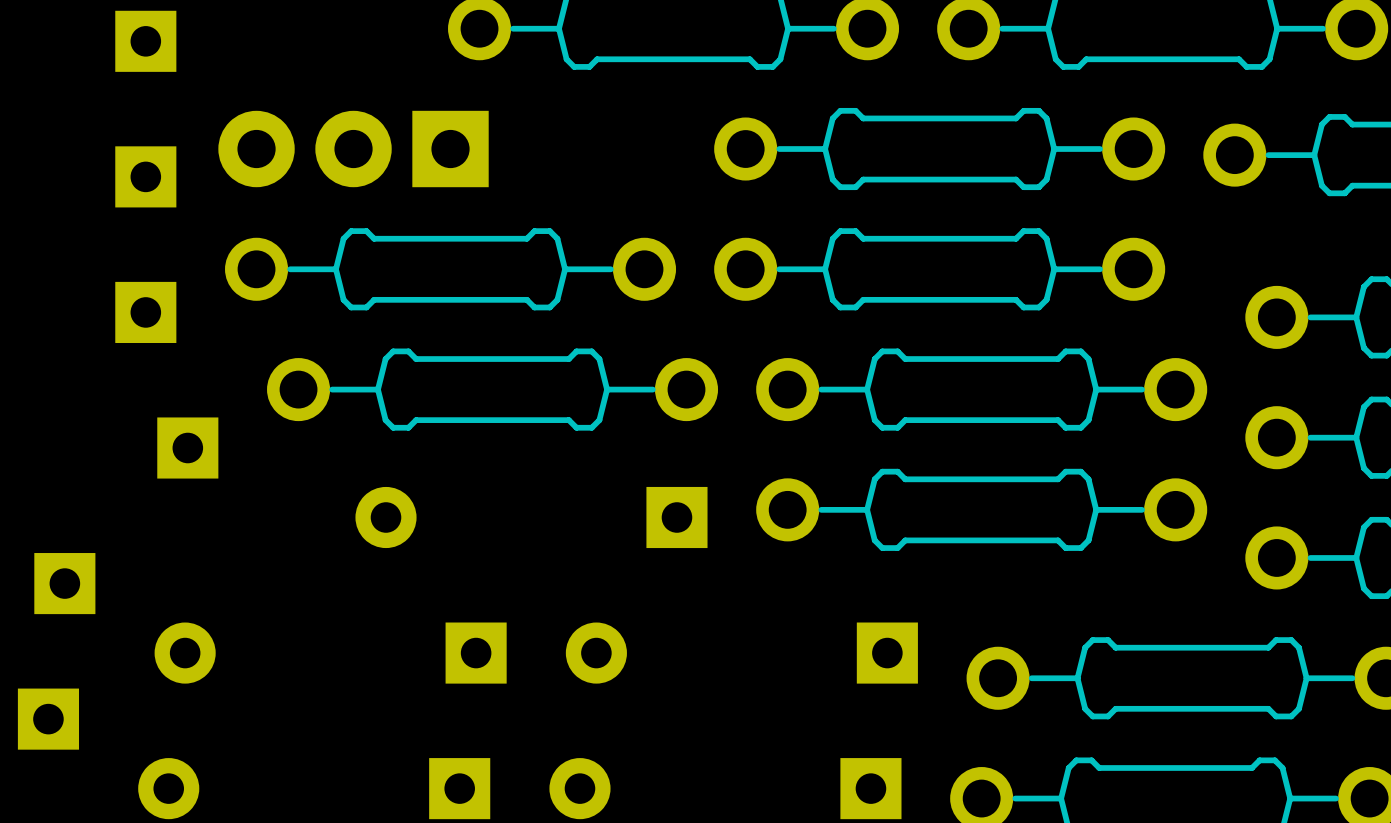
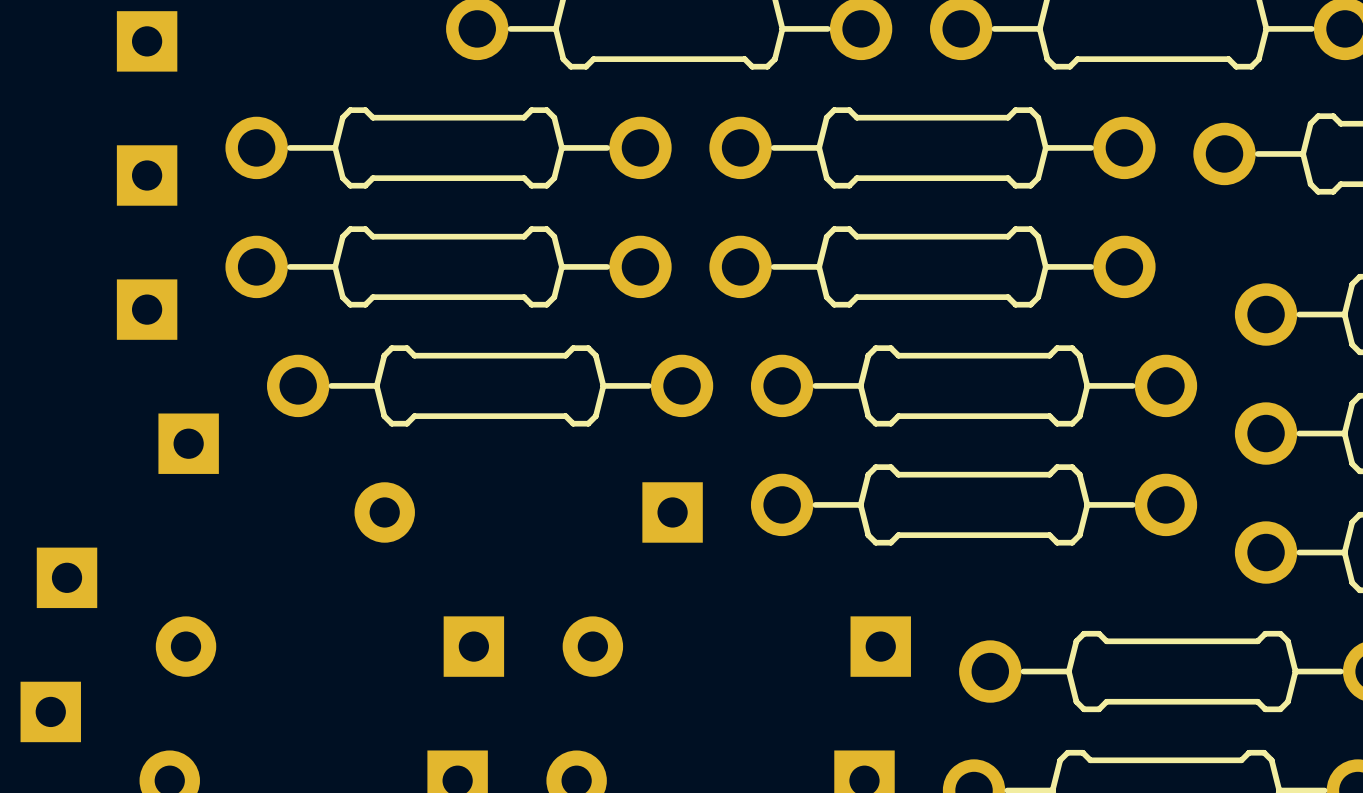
part: (353, 149) -> none
part: none -> (448, 147)

